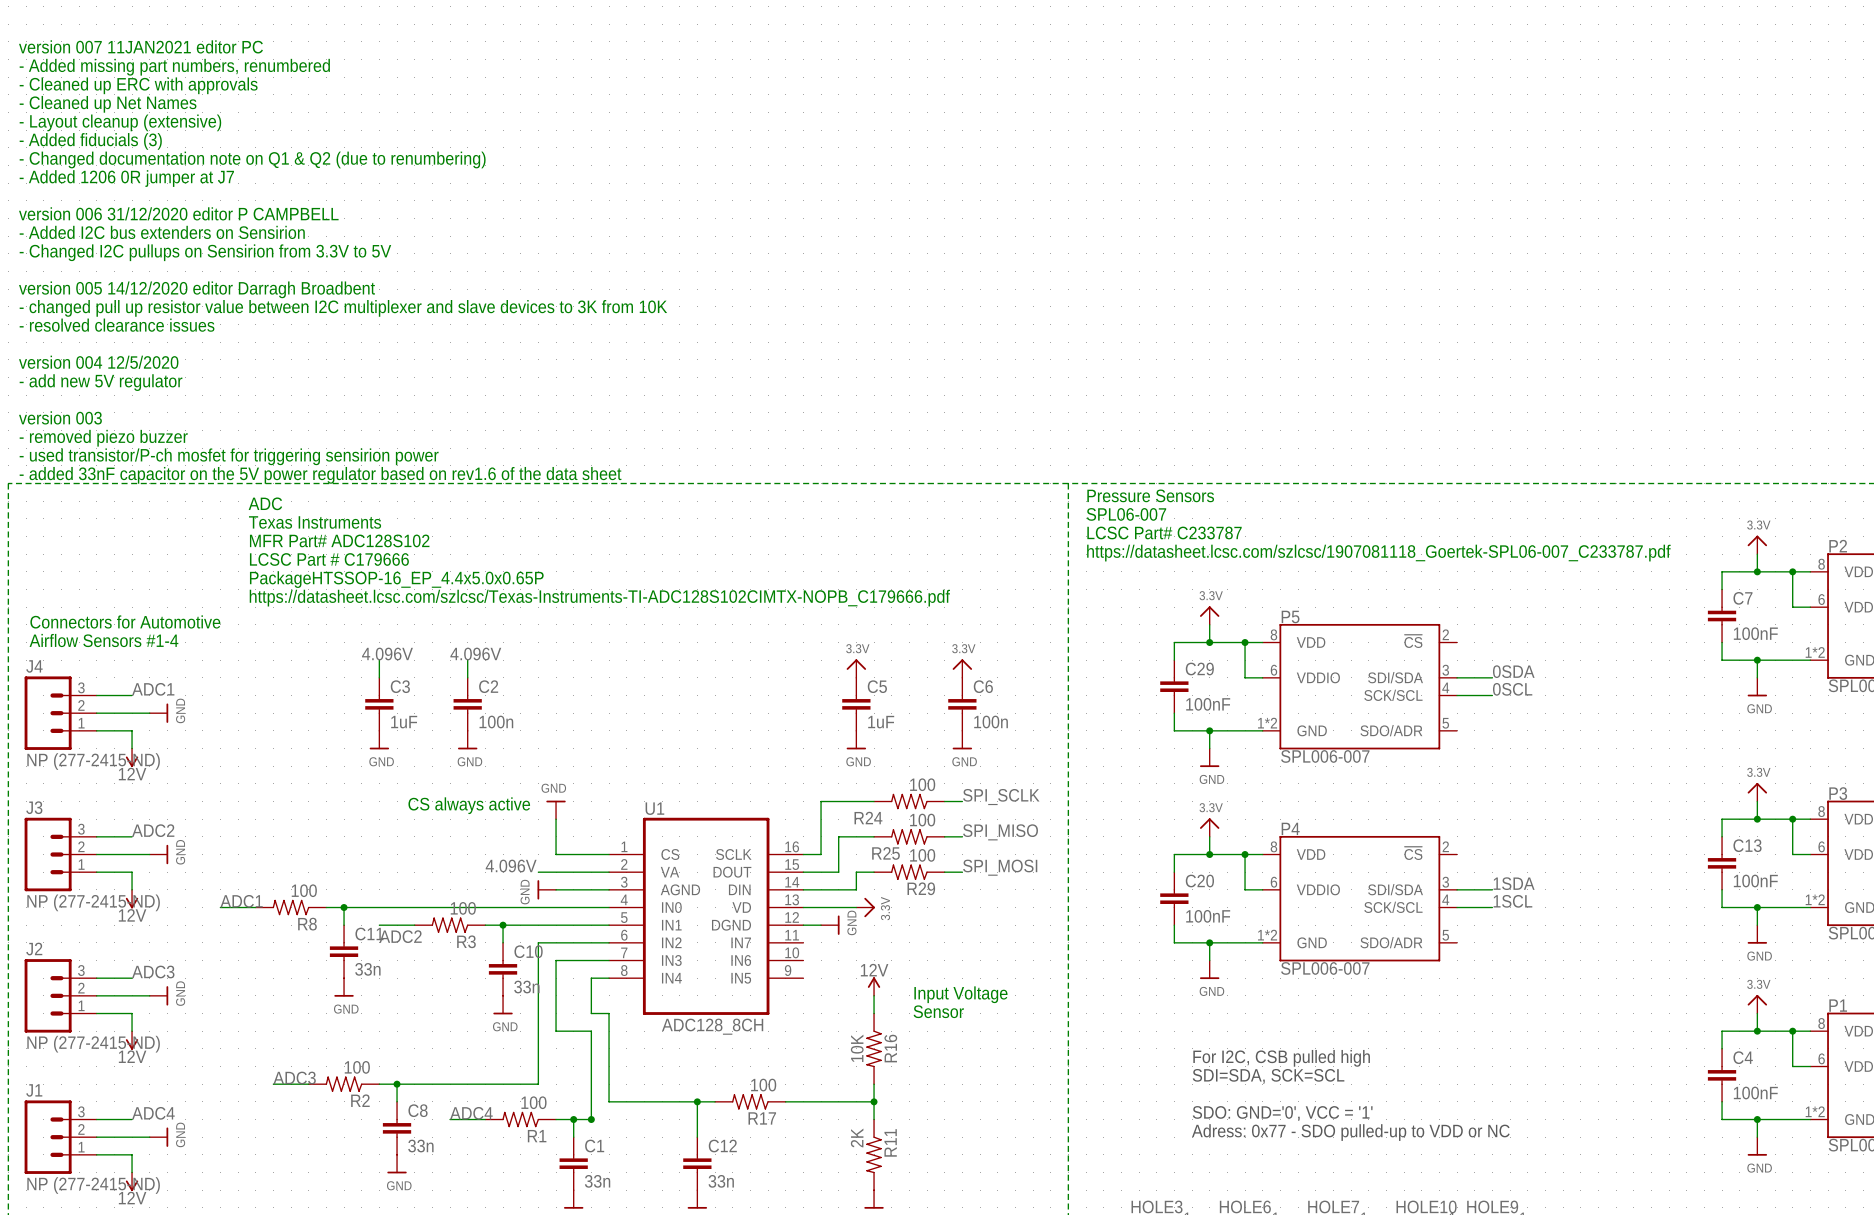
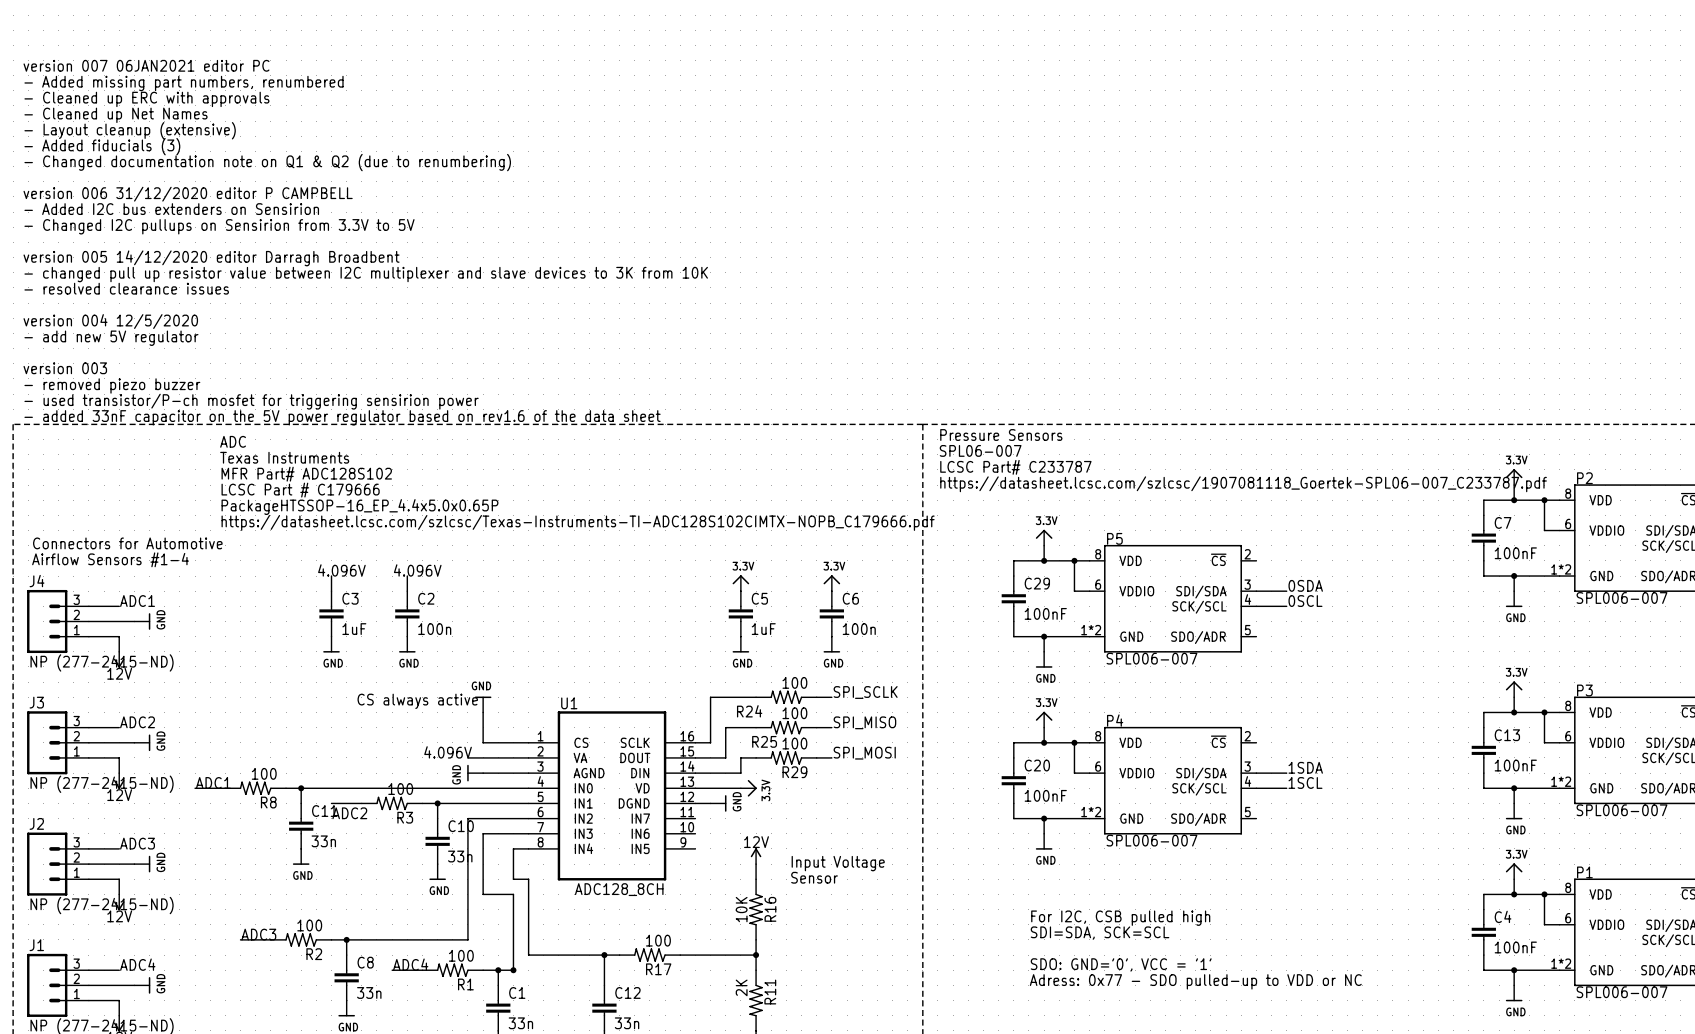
text: version 007 11JAN2021 editor PC (140, 46) -> none
text: - Added missing part numbers, renumbered (174, 67) -> version 007 06JAN2021 editor PC (146, 65)
text: - Cleaned up ERC with approvals (138, 85) -> - Added missing part numbers, renumbered (184, 83)
text: - Cleaned up Net Names (108, 104) -> - Cleaned up ERC with approvals (146, 99)
text: - Layout cleanup (extensive) (120, 122) -> - Cleaned up Net Names (116, 115)
text: - Added fiducials (3) (90, 141) -> - Layout cleanup (extensive) (130, 130)
text: - Changed documentation note on Q1 & Q2 (due to renumbering) (252, 159) -> - Added fiducials (3) (102, 146)
text: - Added 1206 0R jumper at J7 (126, 178) -> - Changed documentation note on Q1 & Q2 (due to renumbering) (267, 162)

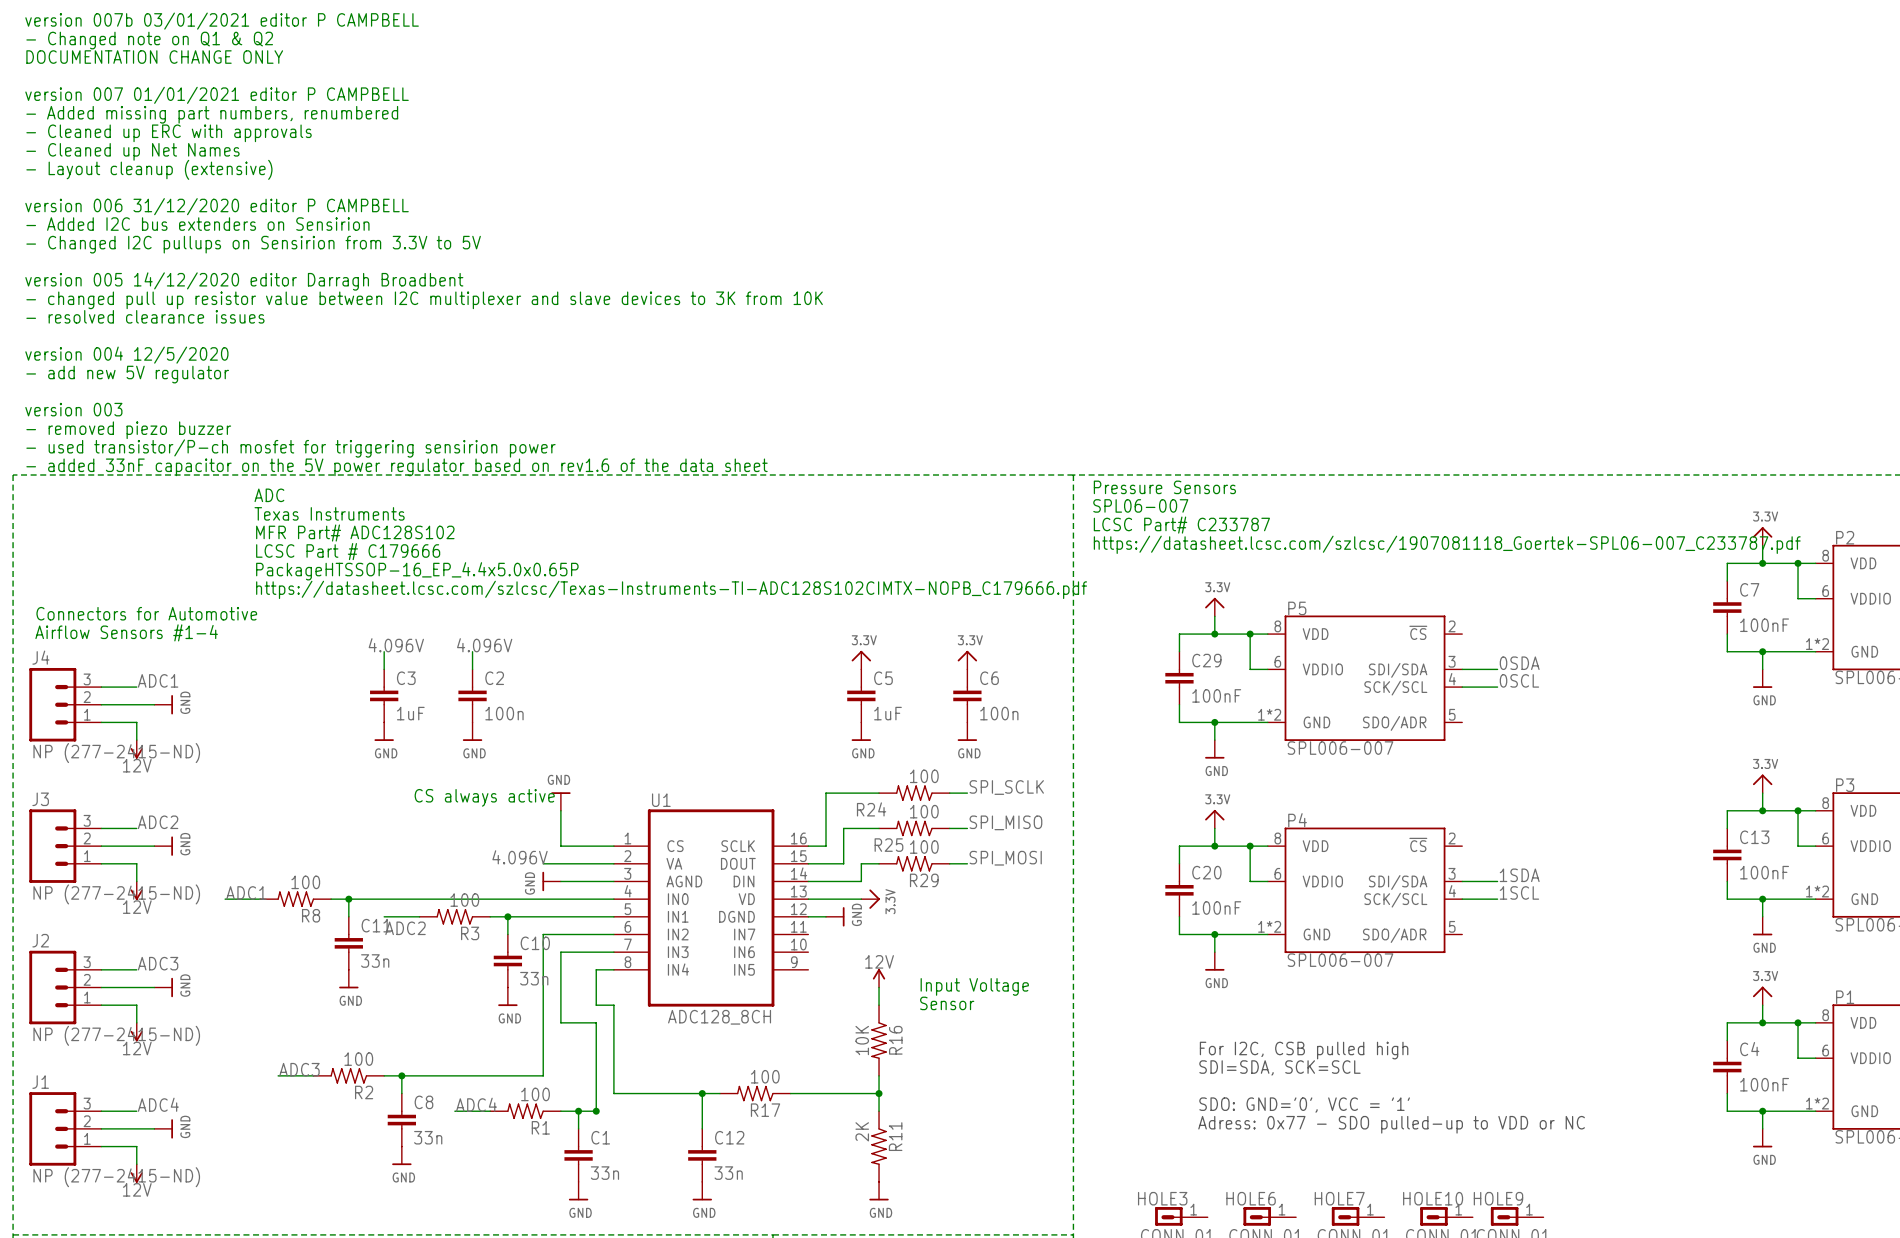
text: none -> version 007b 03/01/2021 editor P CAMPBELL (222, 21)
text: none -> - Changed note on Q1 & Q2 (149, 40)
text: version 007 06JAN2021 editor PC (146, 65) -> DOCUMENTATION CHANGE ONLY (154, 57)
text: - Added missing part numbers, renumbered (184, 83) -> none
text: - Cleaned up ERC with approvals (146, 99) -> version 007 01/01/2021 editor P CAMPBELL (217, 95)
text: - Cleaned up Net Names (116, 115) -> - Added missing part numbers, renumbered (212, 114)
text: - Layout cleanup (extensive) (130, 130) -> - Cleaned up ERC with approvals (169, 133)
text: - Added fiducials (3) (102, 146) -> - Cleaned up Net Names (132, 151)
text: - Changed documentation note on Q1 & Q2 (due to renumbering) (267, 162) -> - Layout cleanup (extensive) (149, 169)

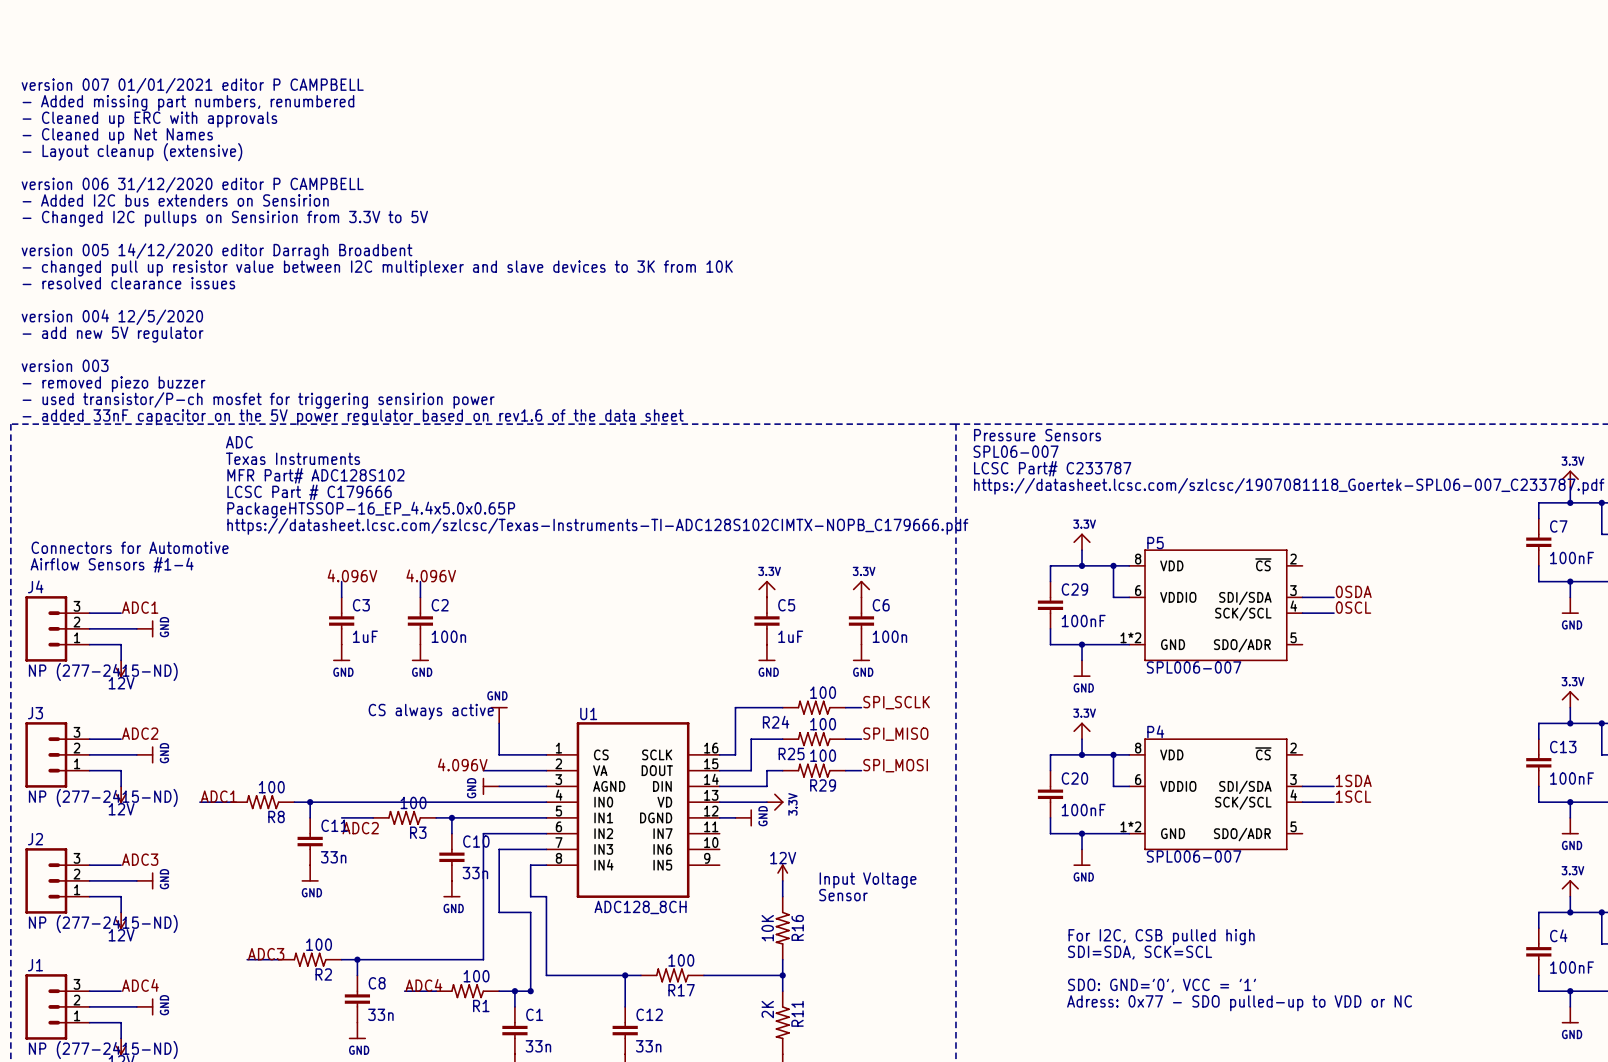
text: version 007b 03/01/2021 editor P CAMPBELL (222, 21) -> none
text: - Changed note on Q1 & Q2 (149, 40) -> none
text: DOCUMENTATION CHANGE ONLY (154, 57) -> none

